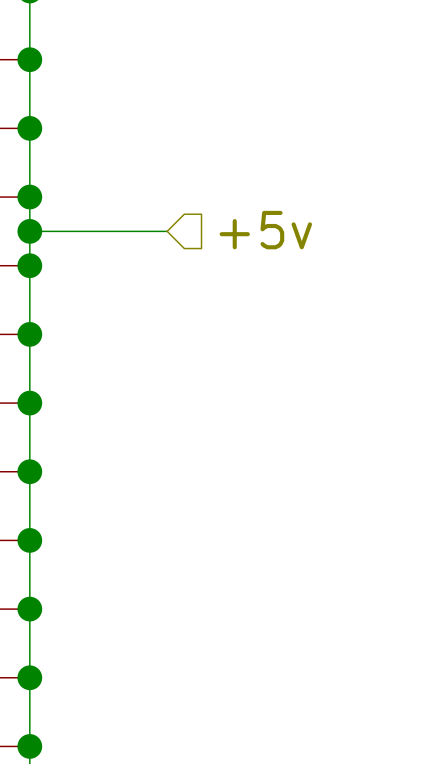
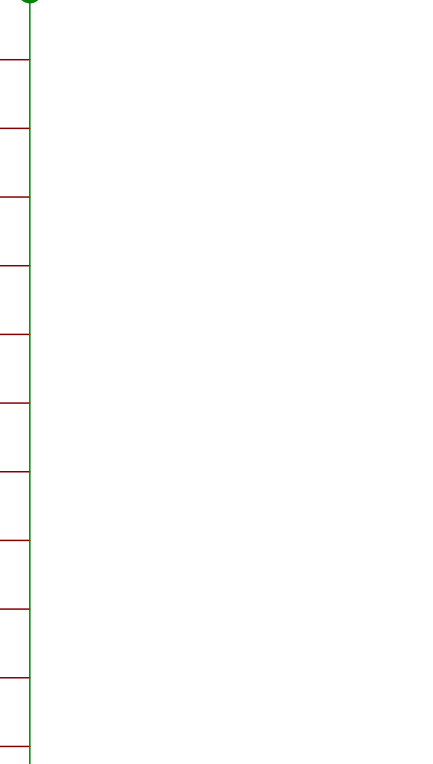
junction: (29, 59) -> none
junction: (29, 128) -> none
junction: (29, 197) -> none
hierarchical label: +5v (265, 230) -> none
wire: (29, 231) (167, 231) -> none
junction: (29, 231) -> none
junction: (29, 265) -> none
junction: (29, 334) -> none
junction: (29, 403) -> none
junction: (29, 471) -> none
junction: (29, 540) -> none
junction: (29, 609) -> none
junction: (29, 677) -> none
junction: (29, 746) -> none

